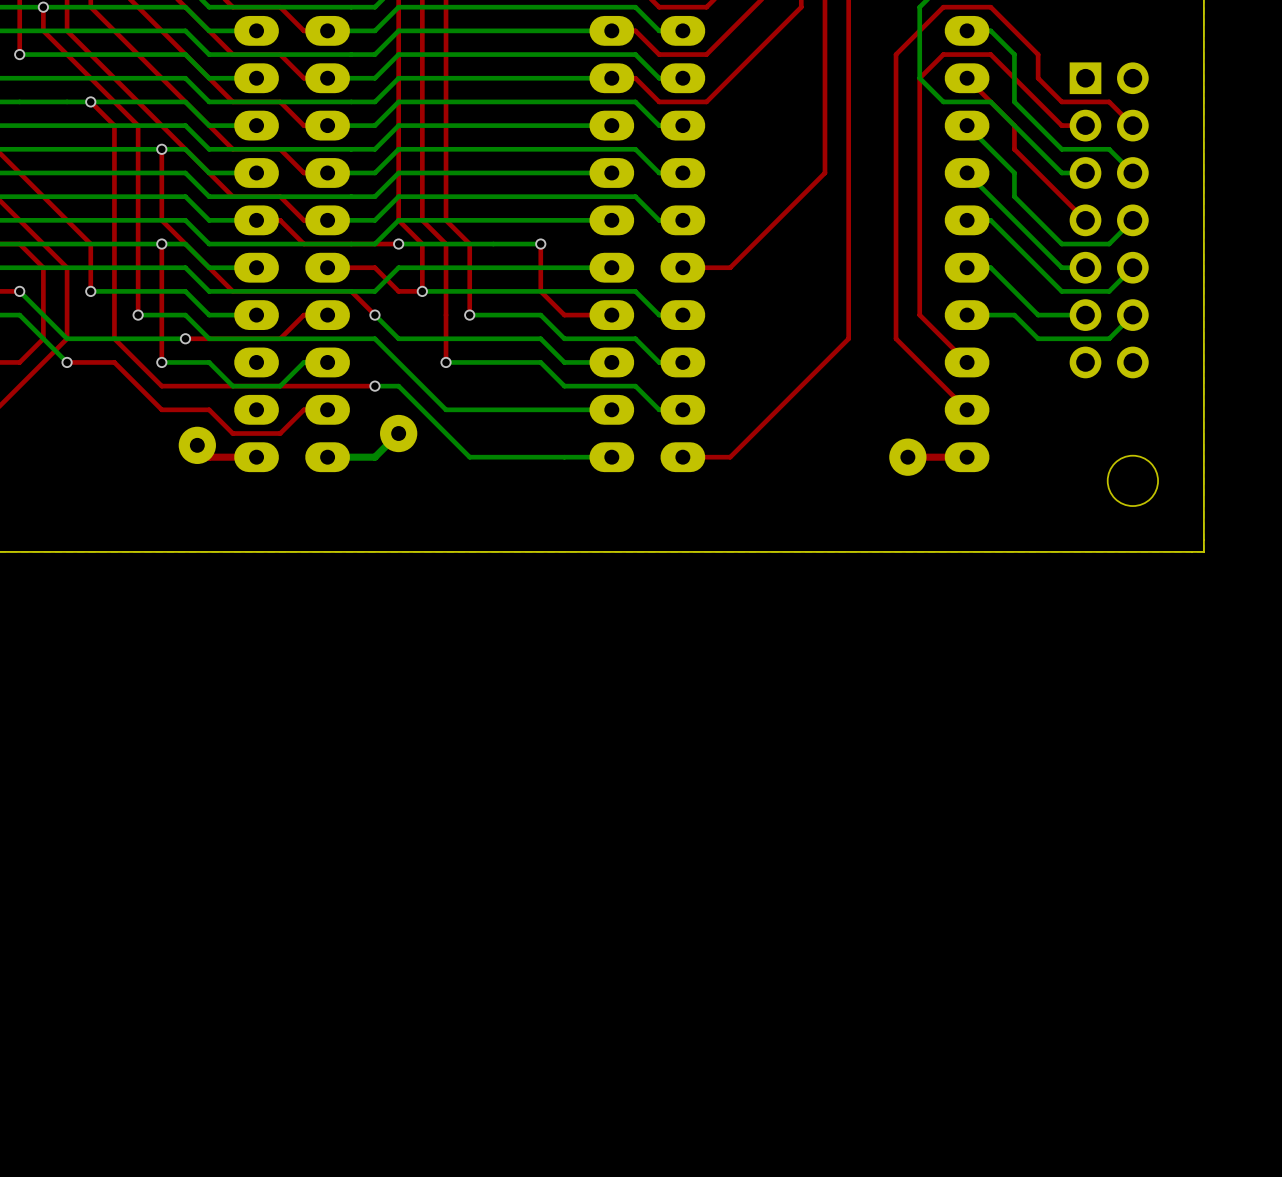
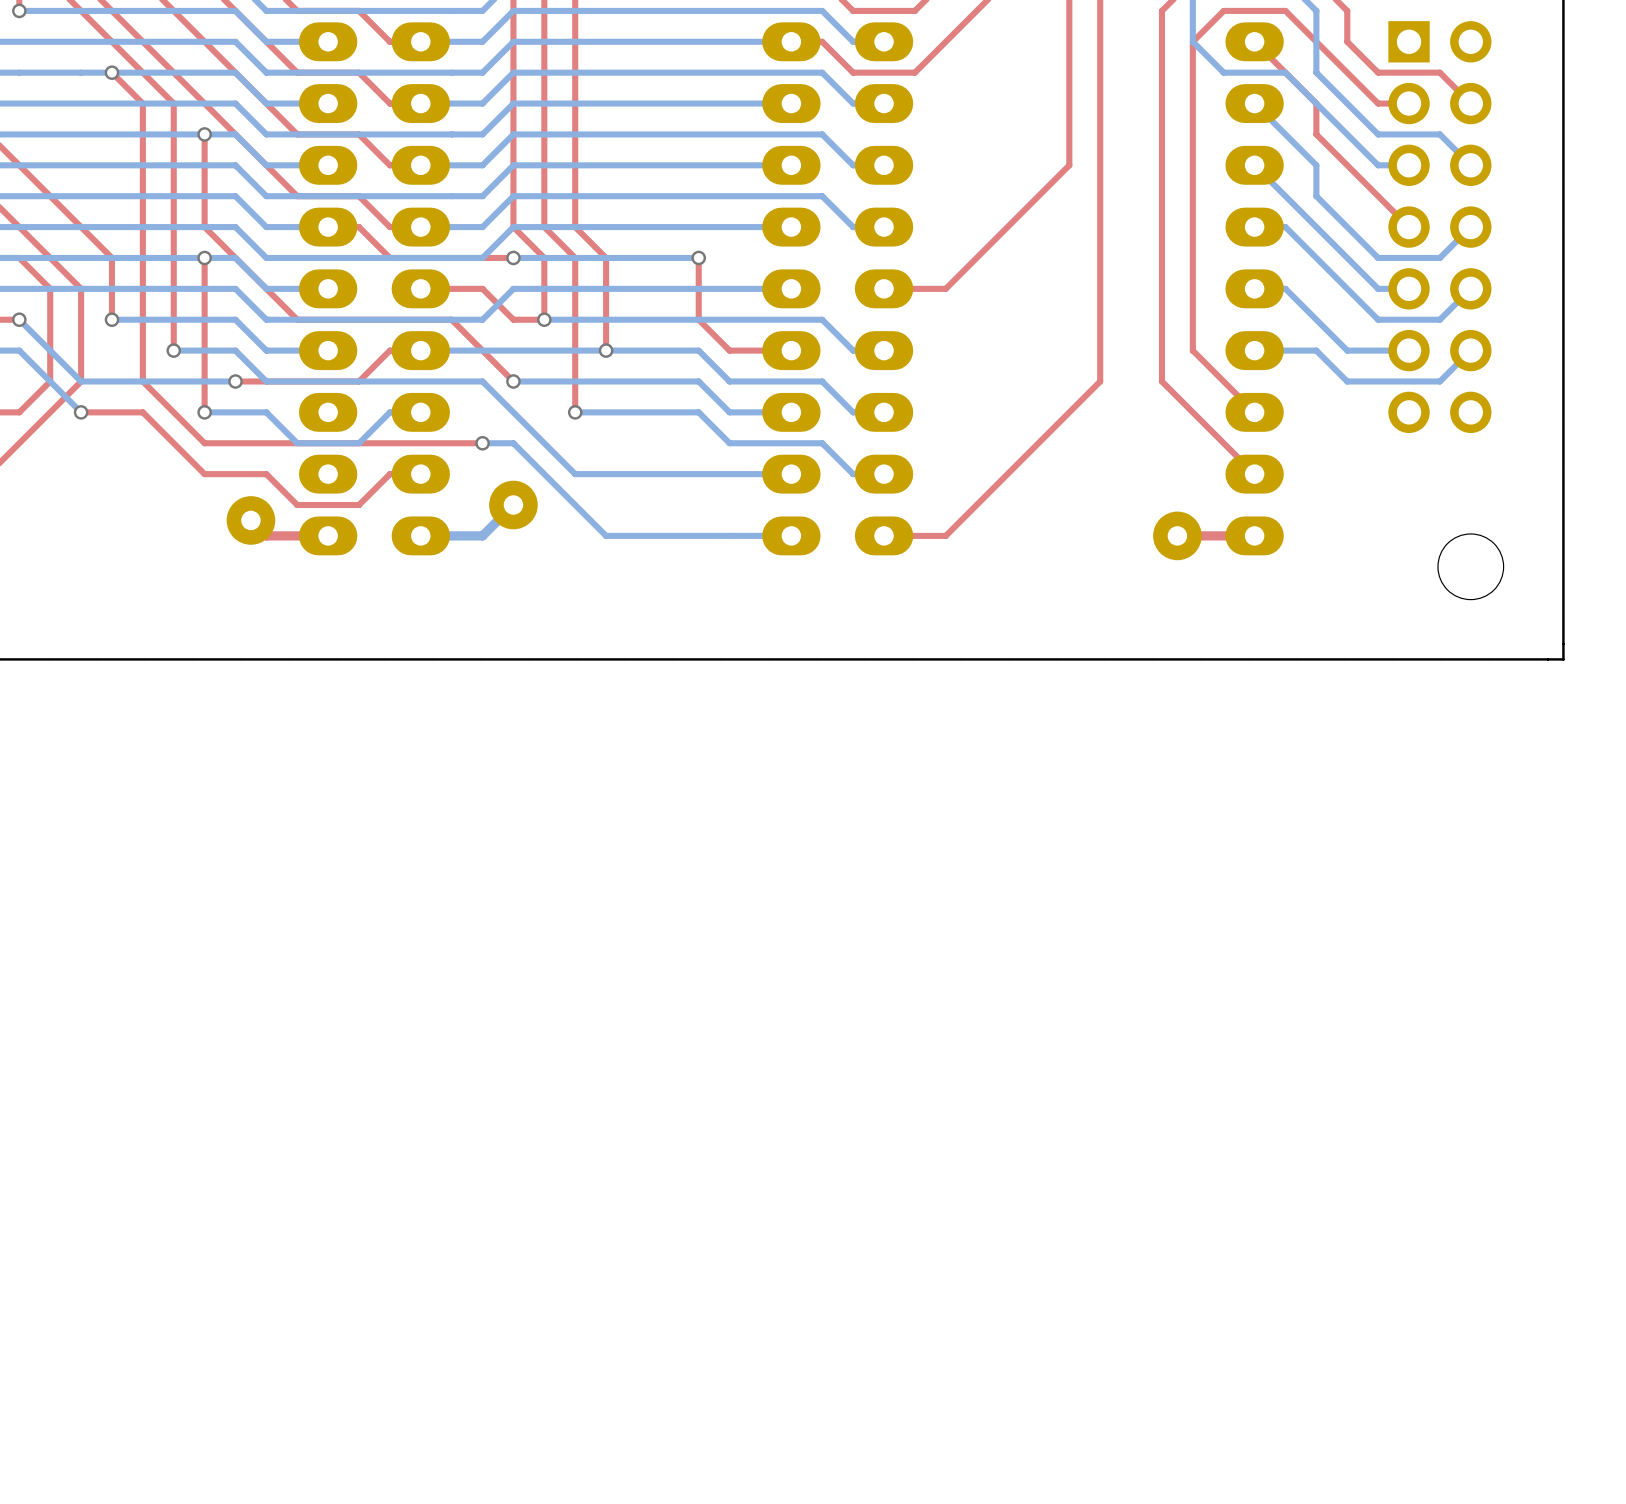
top track: none -> (482, 350) (513, 381)
bottom track: (374, 315) (398, 338) -> none
via position: (374, 315) -> (513, 381)
bottom track: none -> (606, 350) (420, 350)

